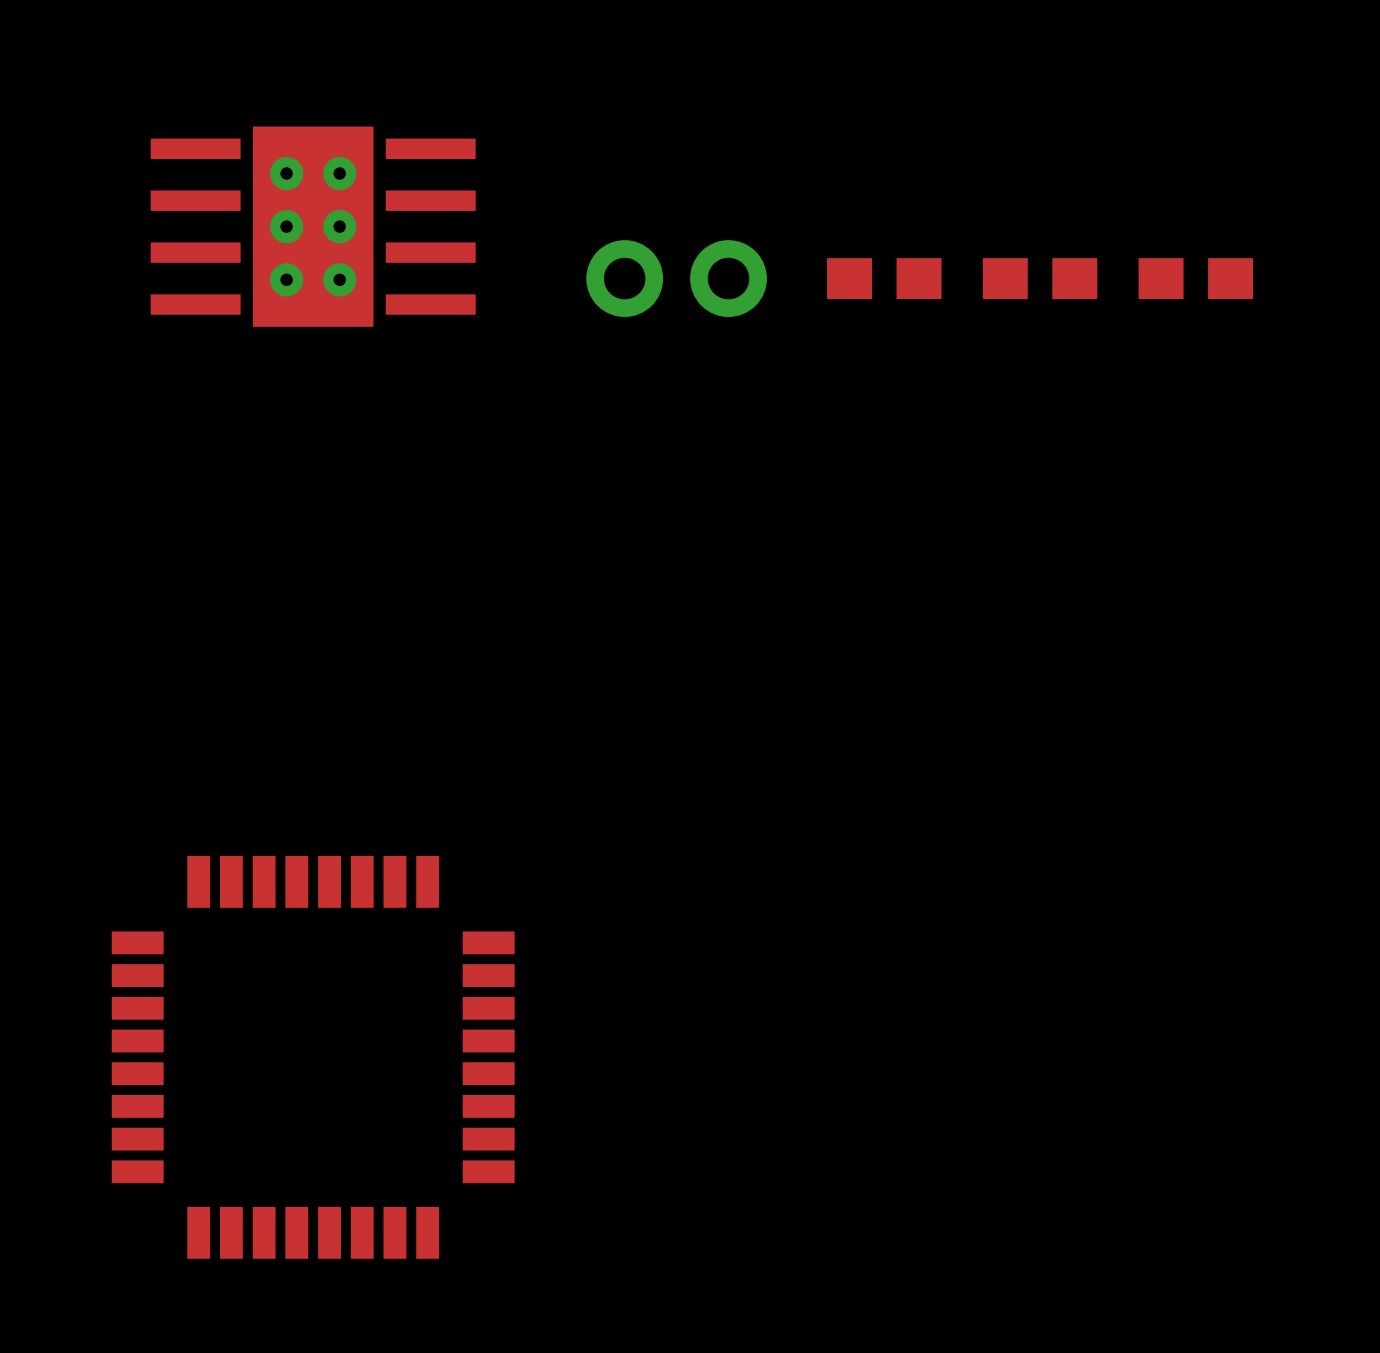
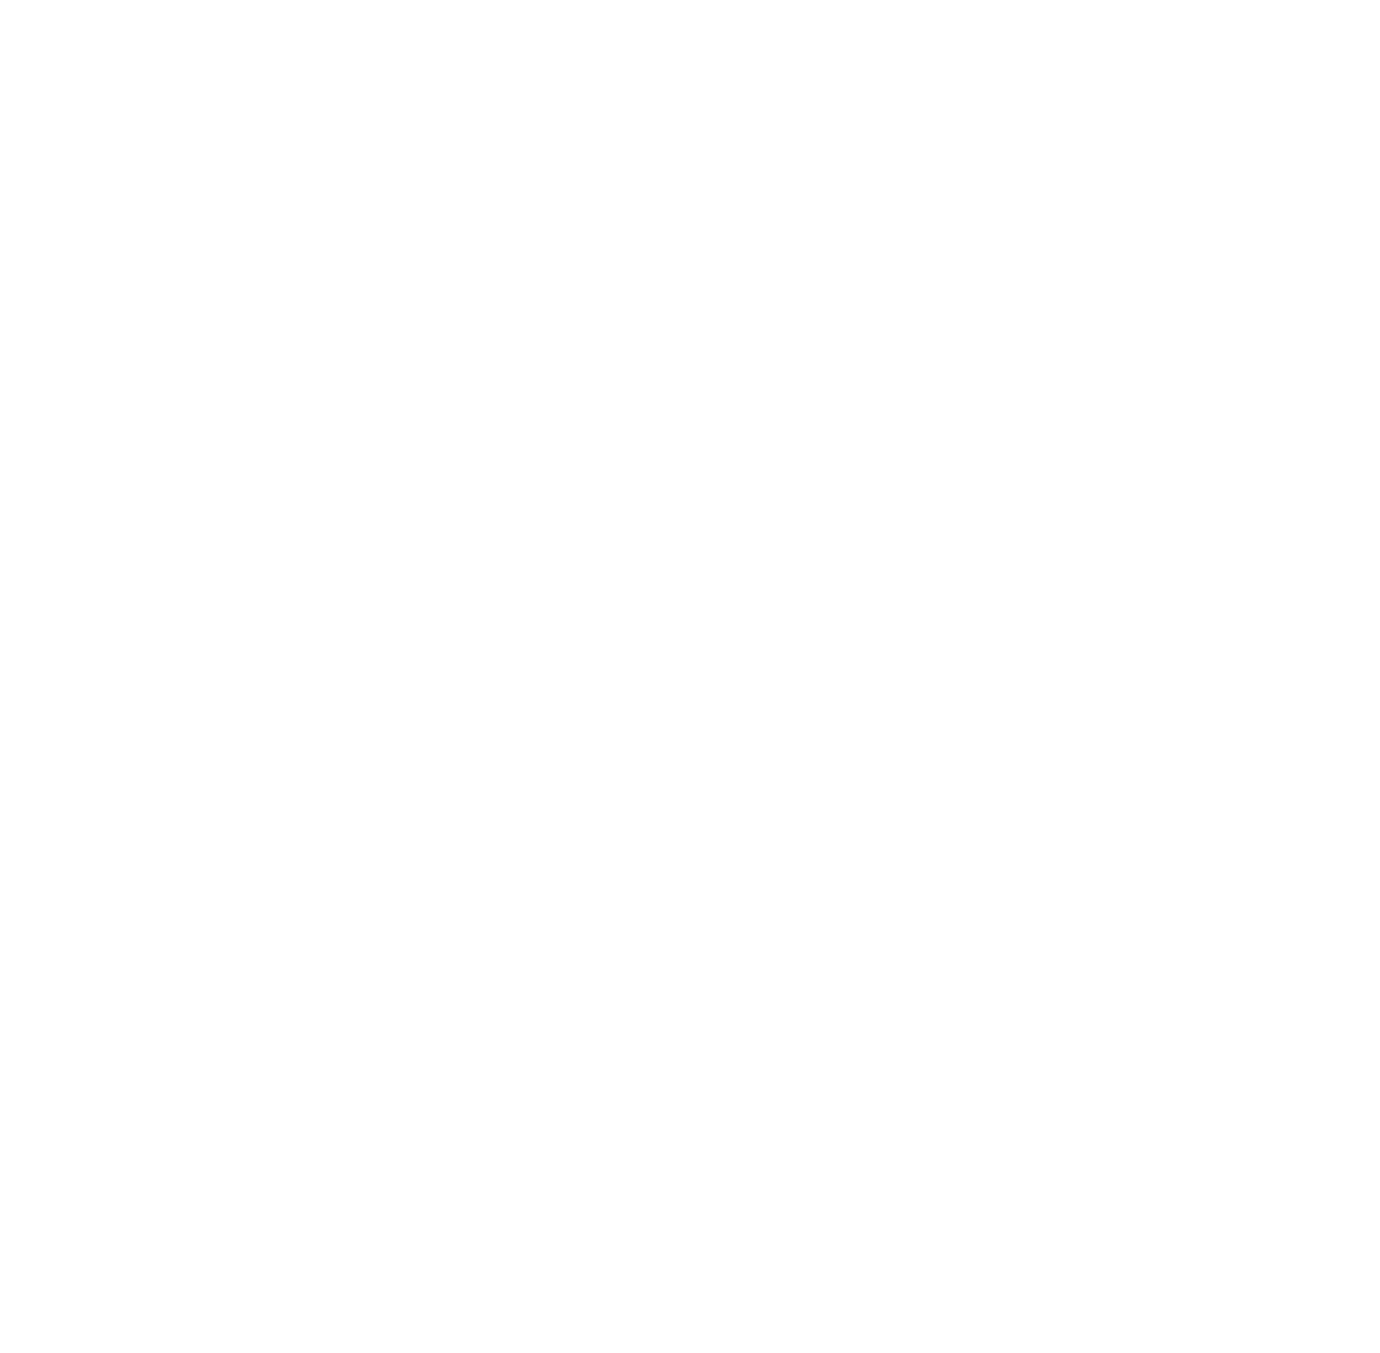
part: (313, 226) -> none
part: (676, 278) -> none
part: (884, 278) -> none
part: (1040, 278) -> none
part: (1195, 278) -> none
part: (313, 1057) -> none

